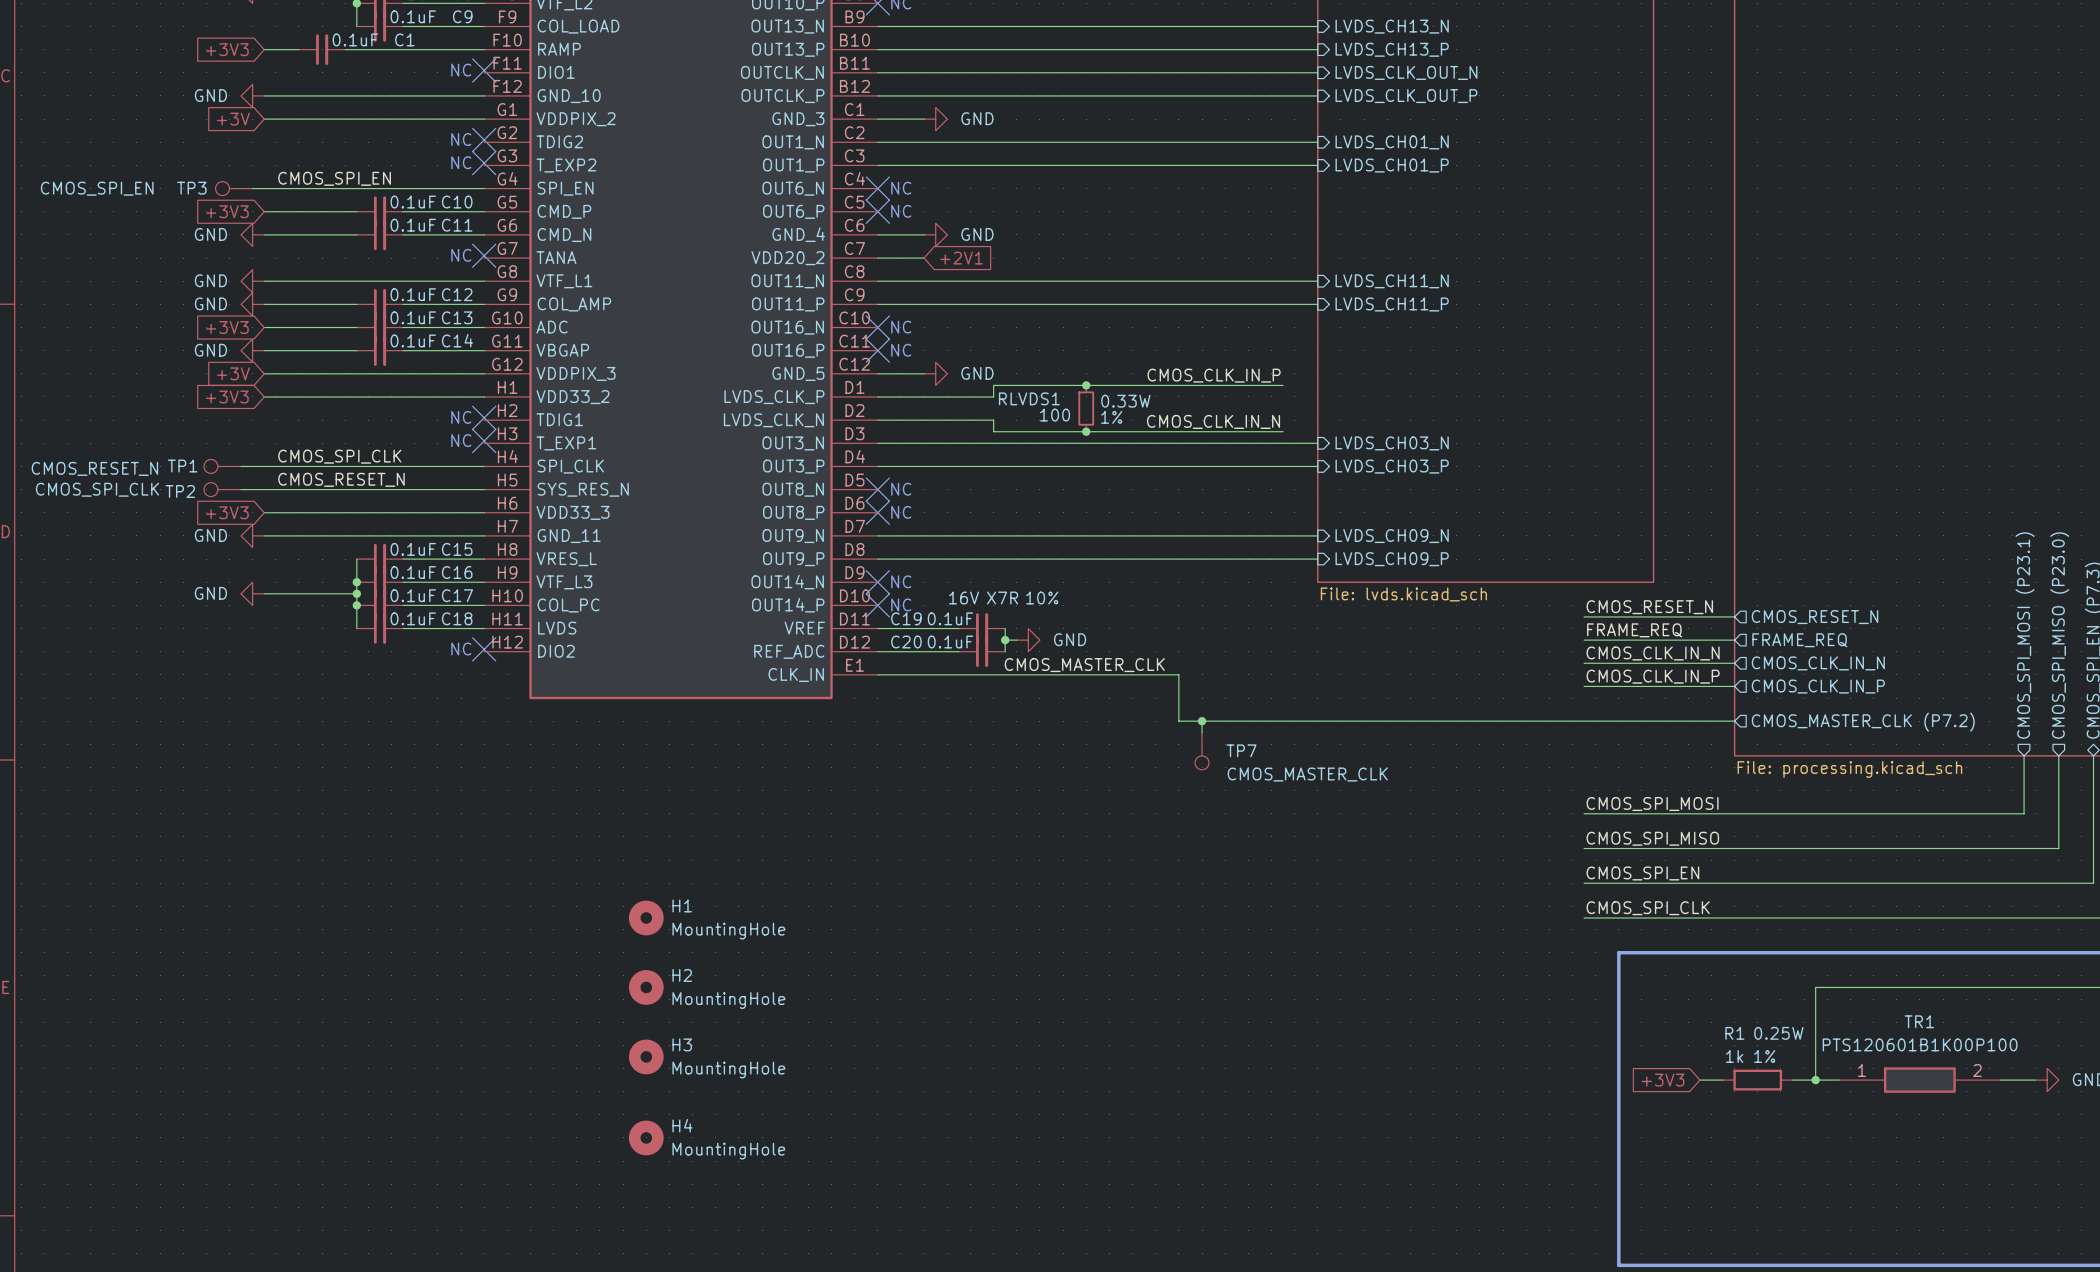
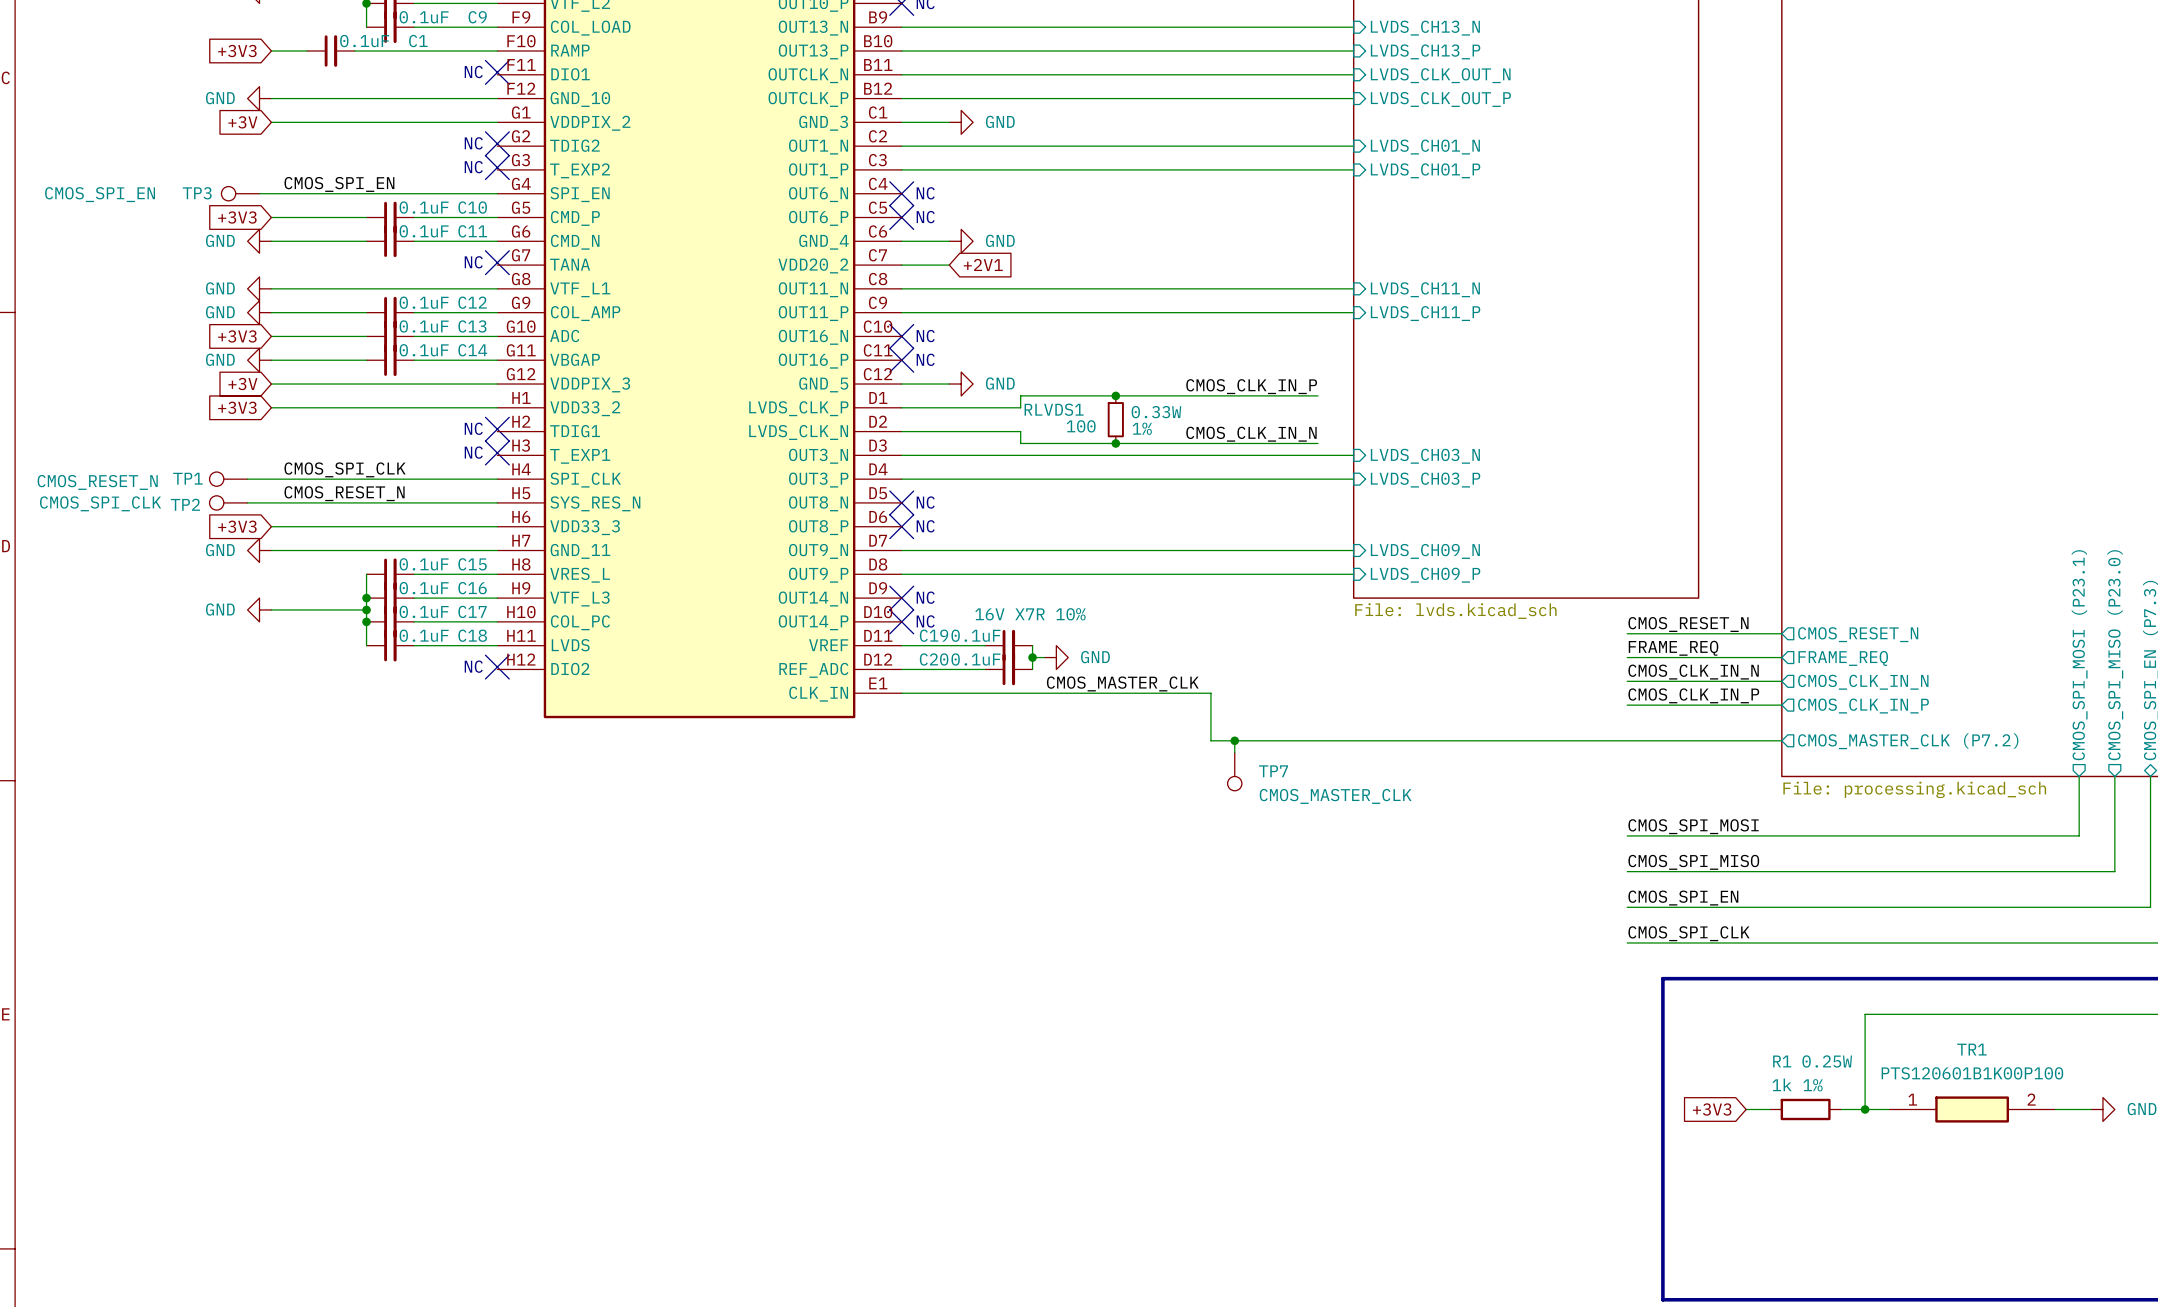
H1: MountingHole (646, 917) -> none
H2: MountingHole (646, 987) -> none
H3: MountingHole (646, 1056) -> none
H4: MountingHole (646, 1137) -> none

